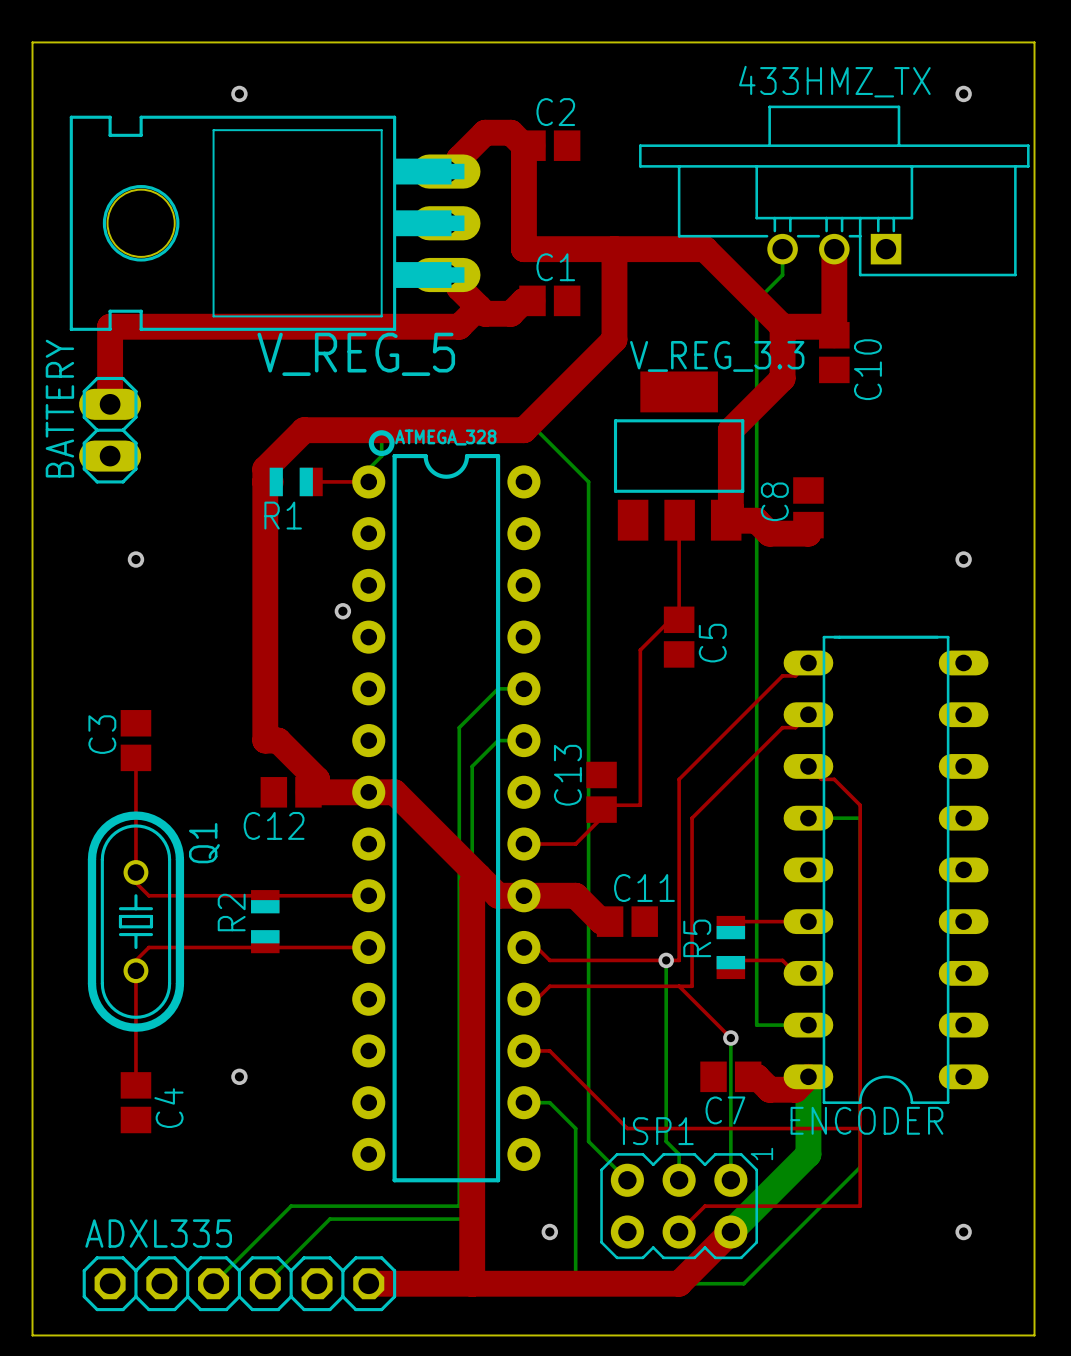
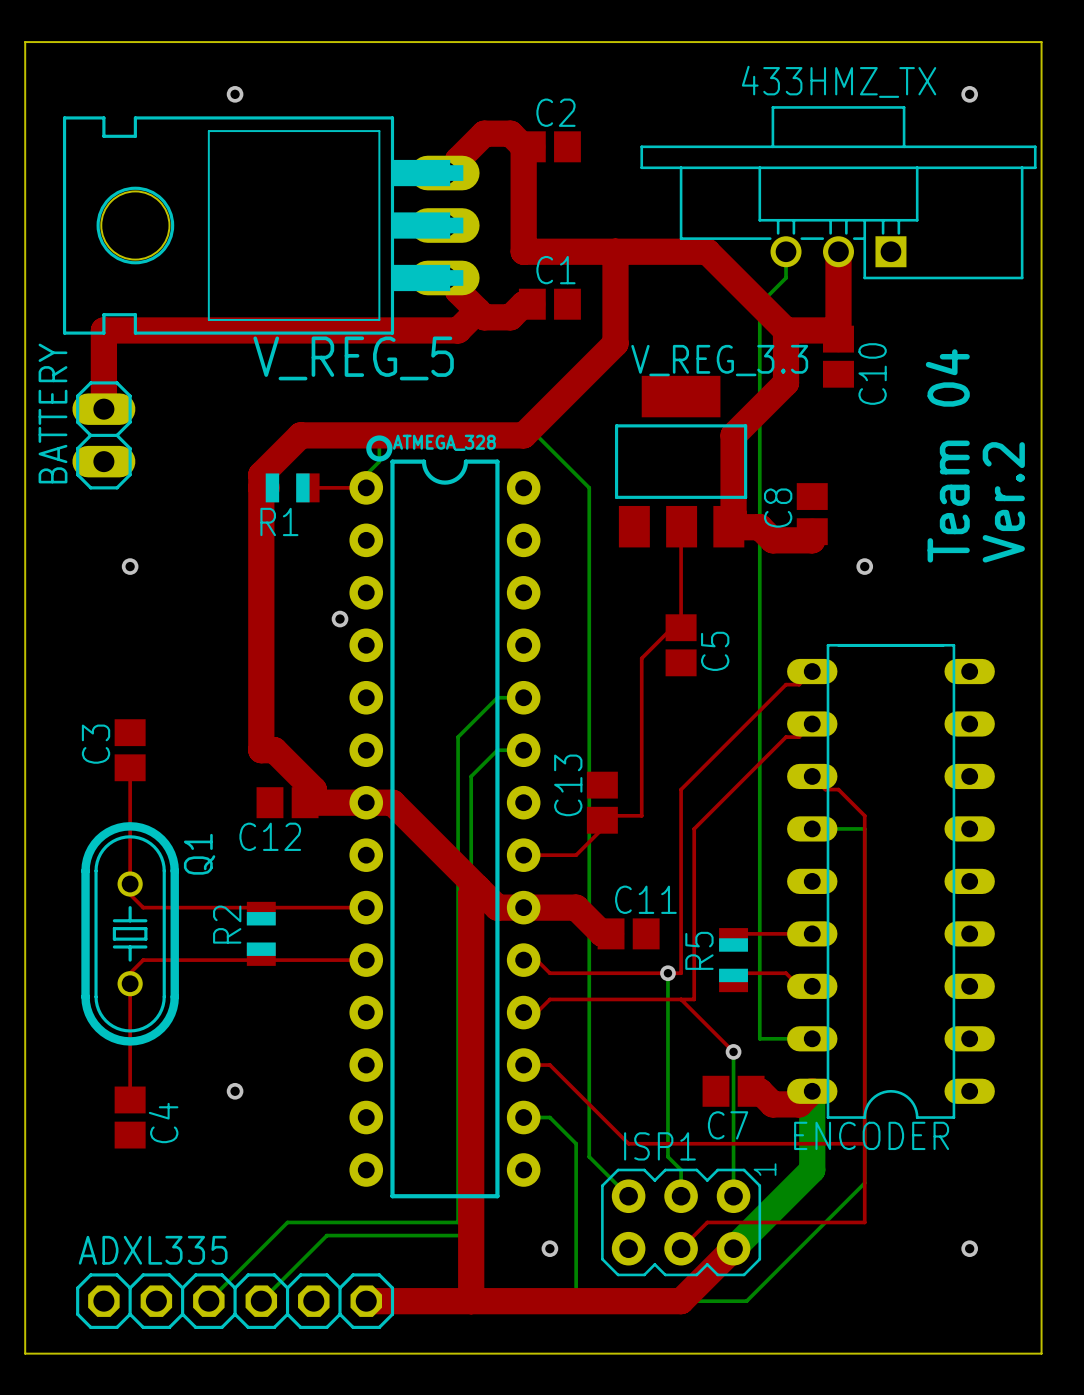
text: none -> Team 04 (947, 455)
text: none -> Ver.2 (1003, 502)
via position: (963, 559) -> (864, 566)

